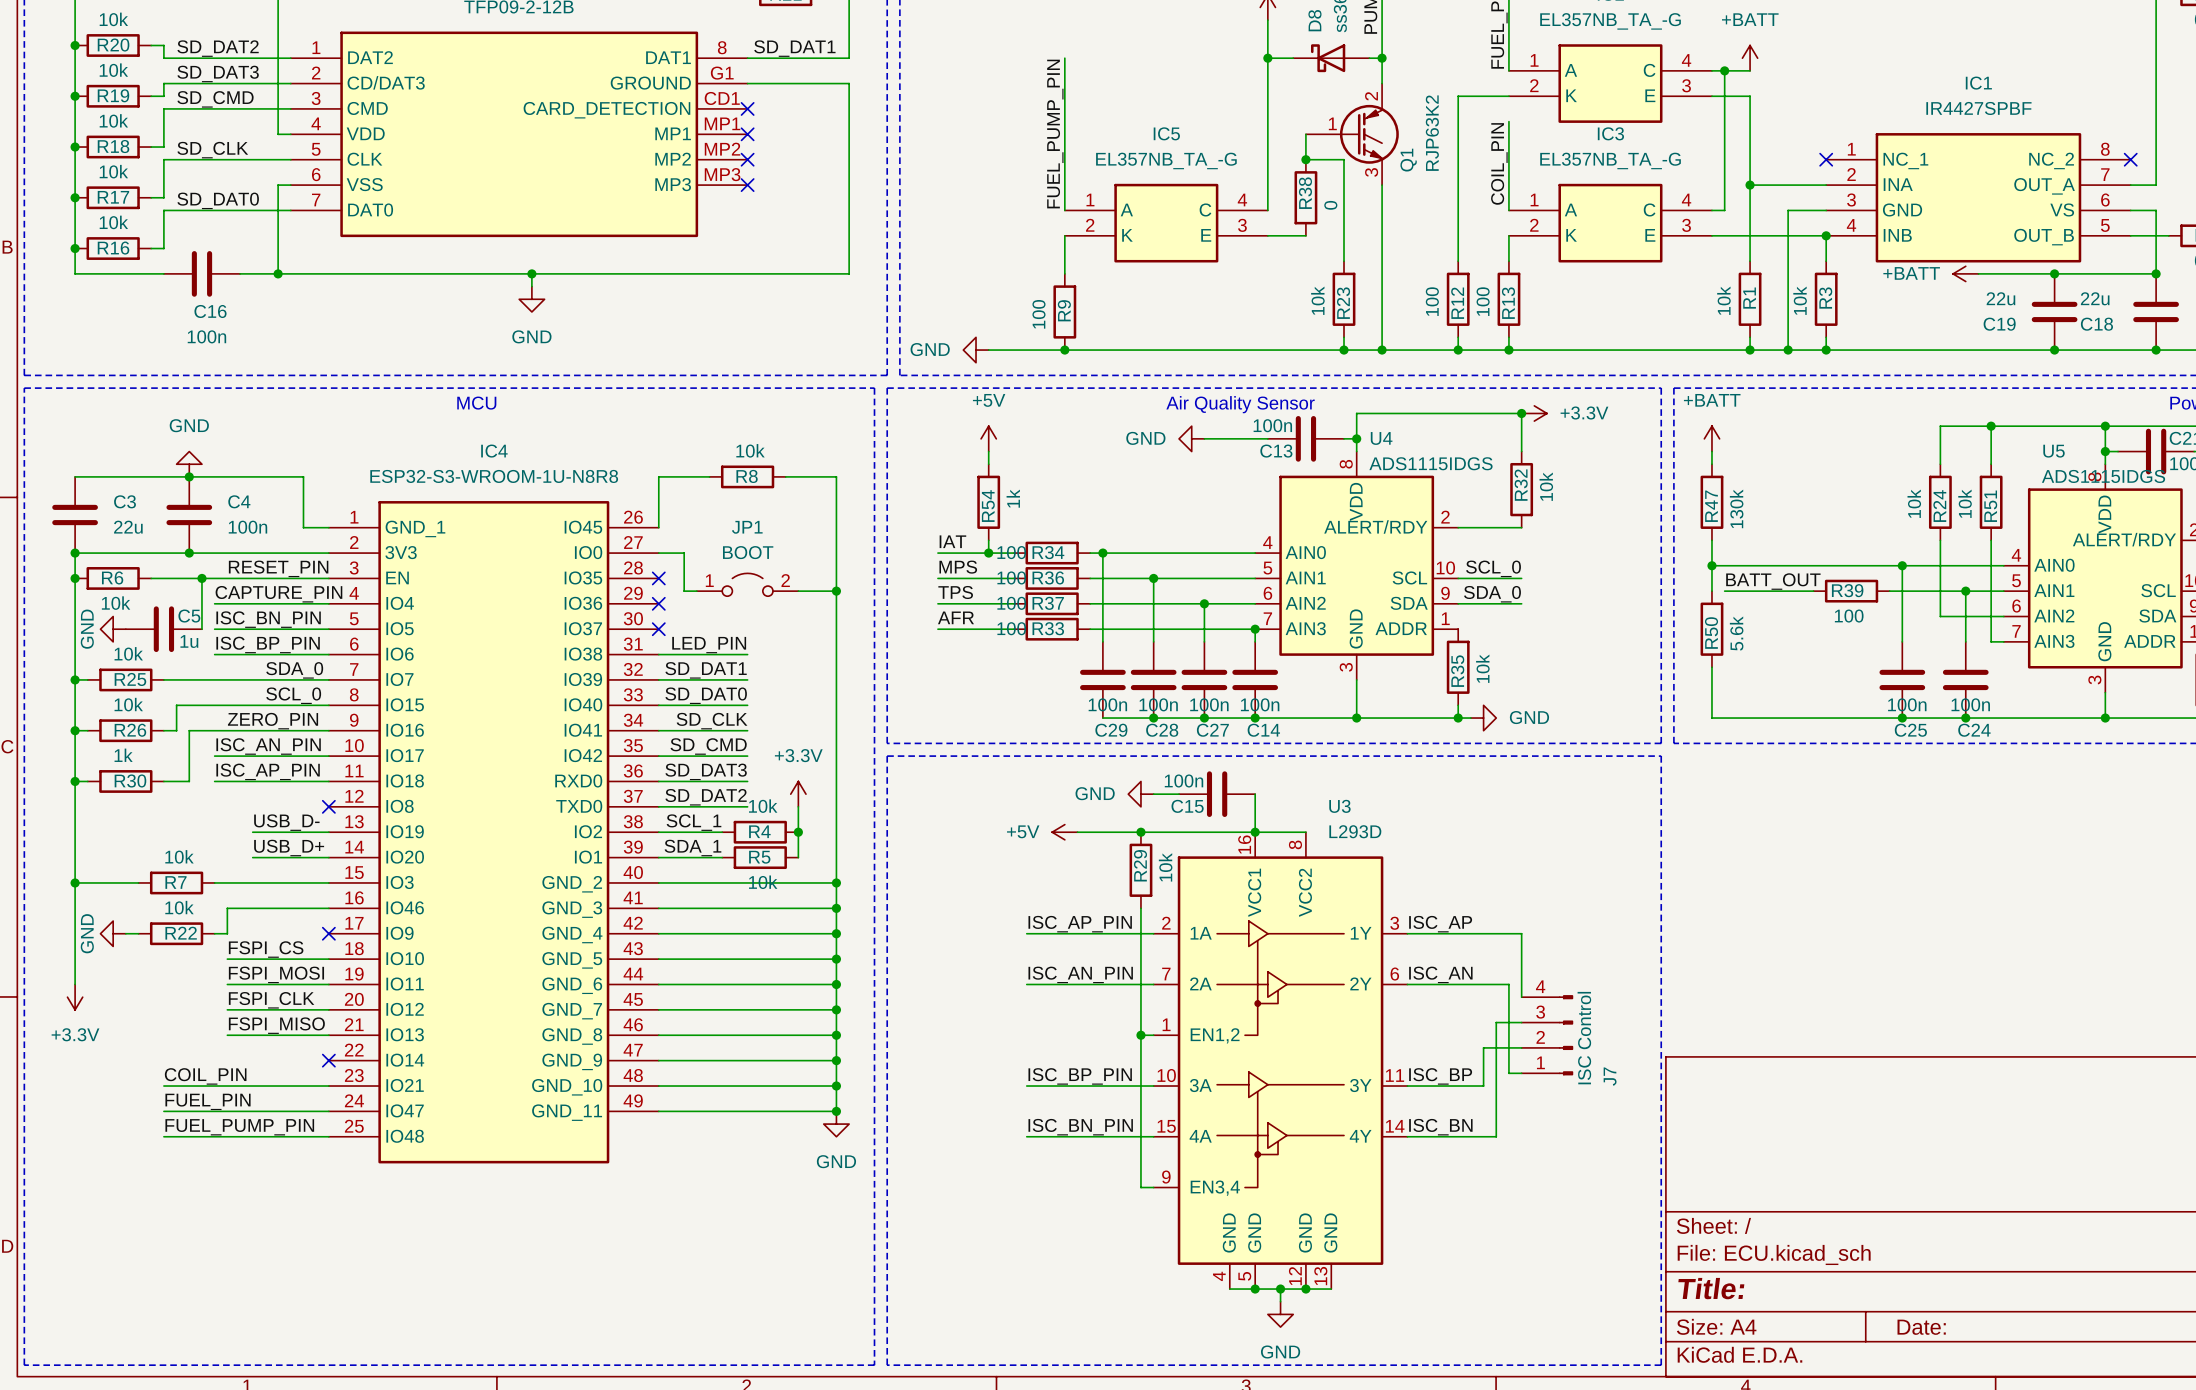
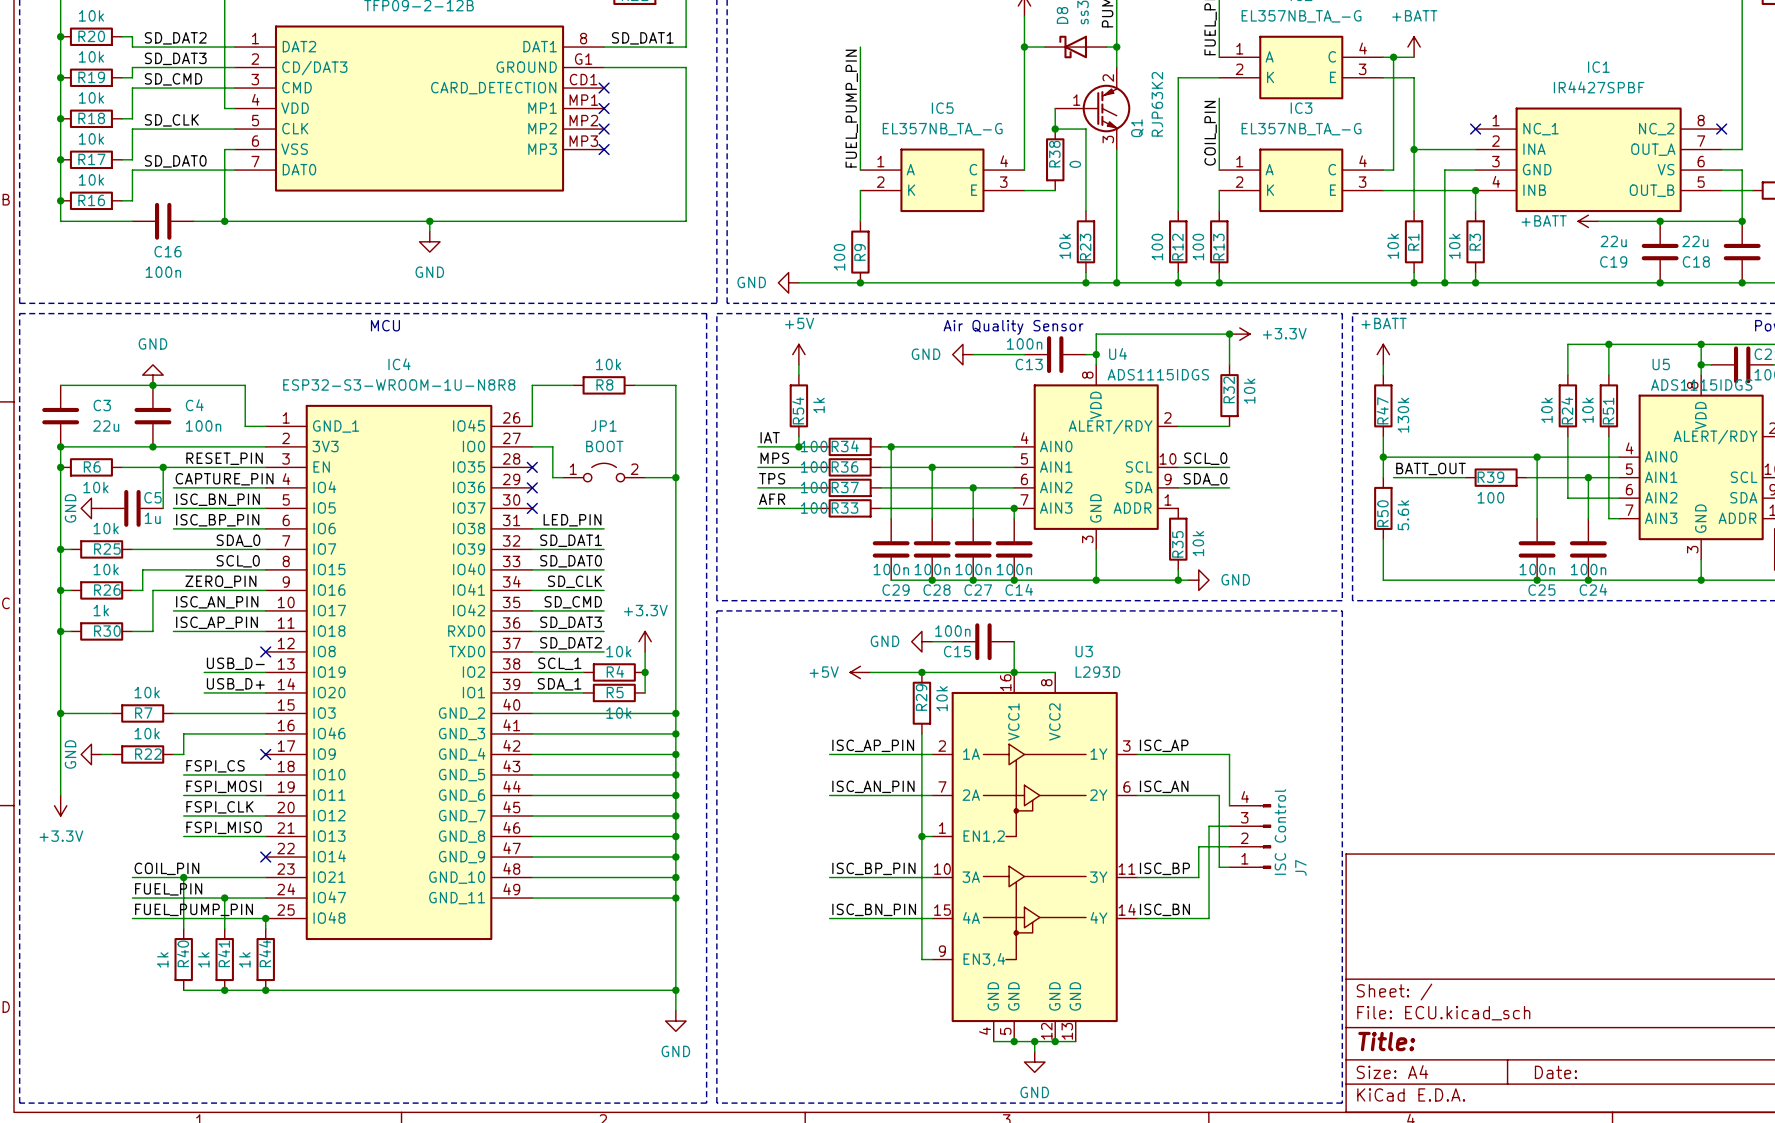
wire: none -> (183, 877) (183, 928)
junction: none -> (183, 877)
wire: none -> (224, 898) (224, 928)
junction: none -> (224, 898)
wire: none -> (675, 898) (675, 1010)
power symbol position: GND (836, 1124) -> GND (675, 1021)
wire: none -> (265, 918) (265, 928)
junction: none -> (265, 918)
R40: none -> 1k (183, 959)
R41: none -> 1k (224, 959)
R44: none -> 1k (265, 959)
wire: none -> (183, 990) (675, 990)
junction: none -> (224, 990)
junction: none -> (265, 990)
junction: none -> (675, 990)

